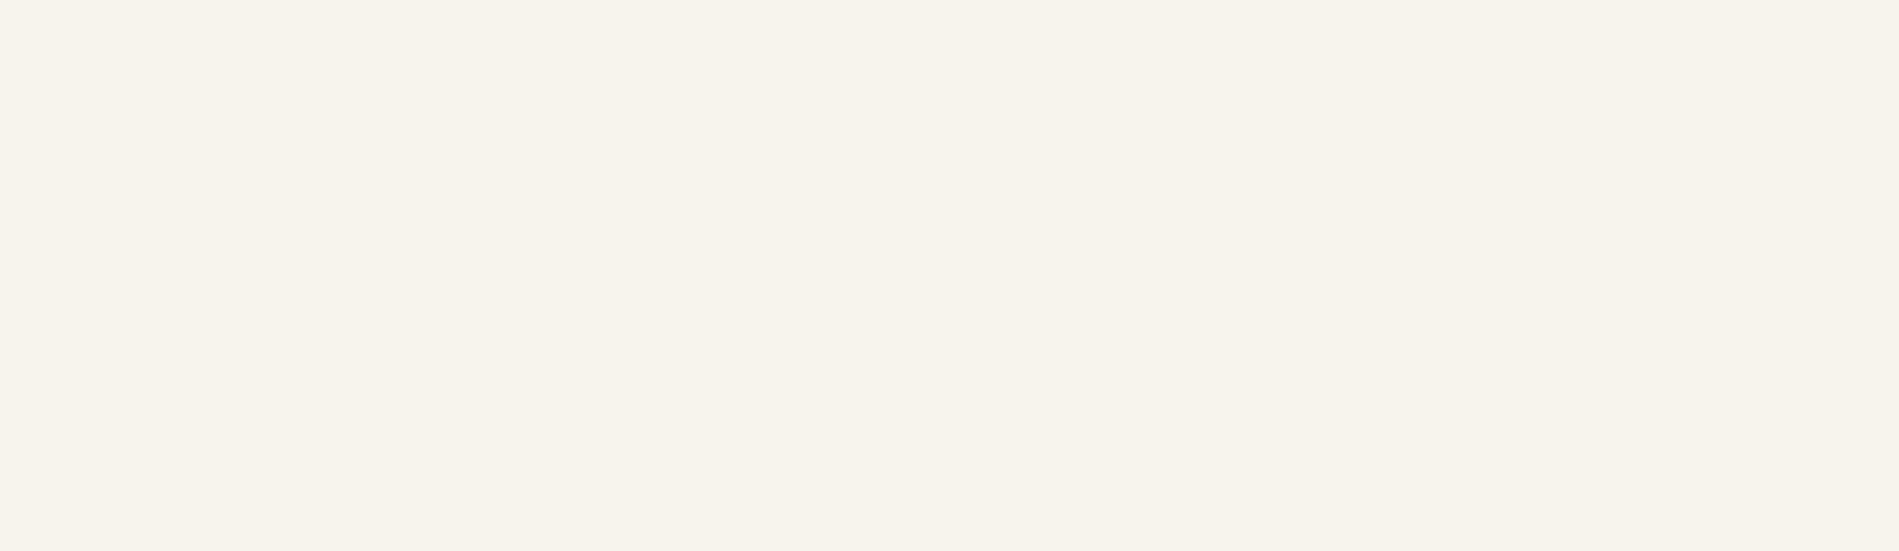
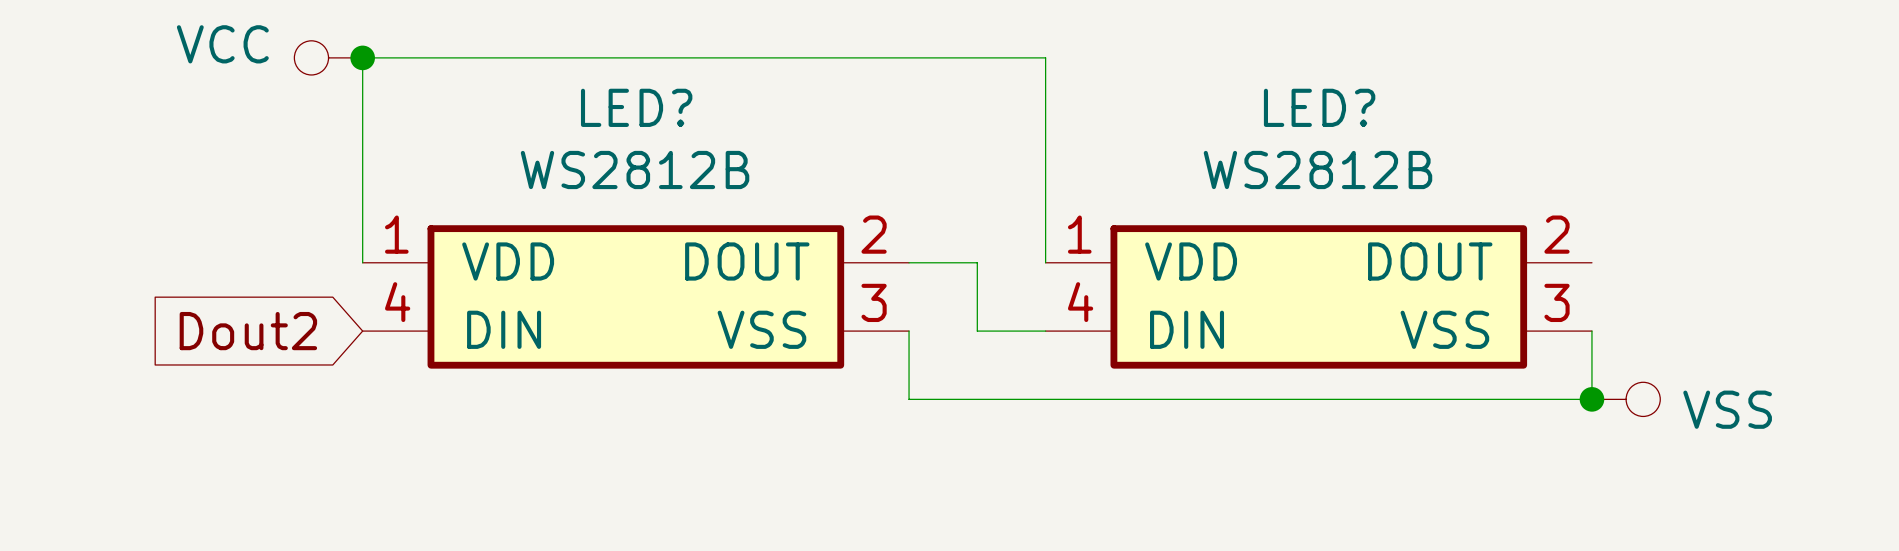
power symbol: none -> VCC (328, 57)
junction: none -> (362, 57)
wire: none -> (362, 262) (362, 57) (1045, 57) (1045, 262)
wire: none -> (909, 262) (977, 262) (977, 331) (1045, 331)
LED?: none -> WS2812B (635, 296)
LED?: none -> WS2812B (1318, 296)
global label: none -> Dout2 (248, 331)
wire: none -> (909, 331) (909, 399) (1591, 399) (1591, 331)
junction: none -> (1591, 399)
power symbol: none -> VSS (1626, 399)

